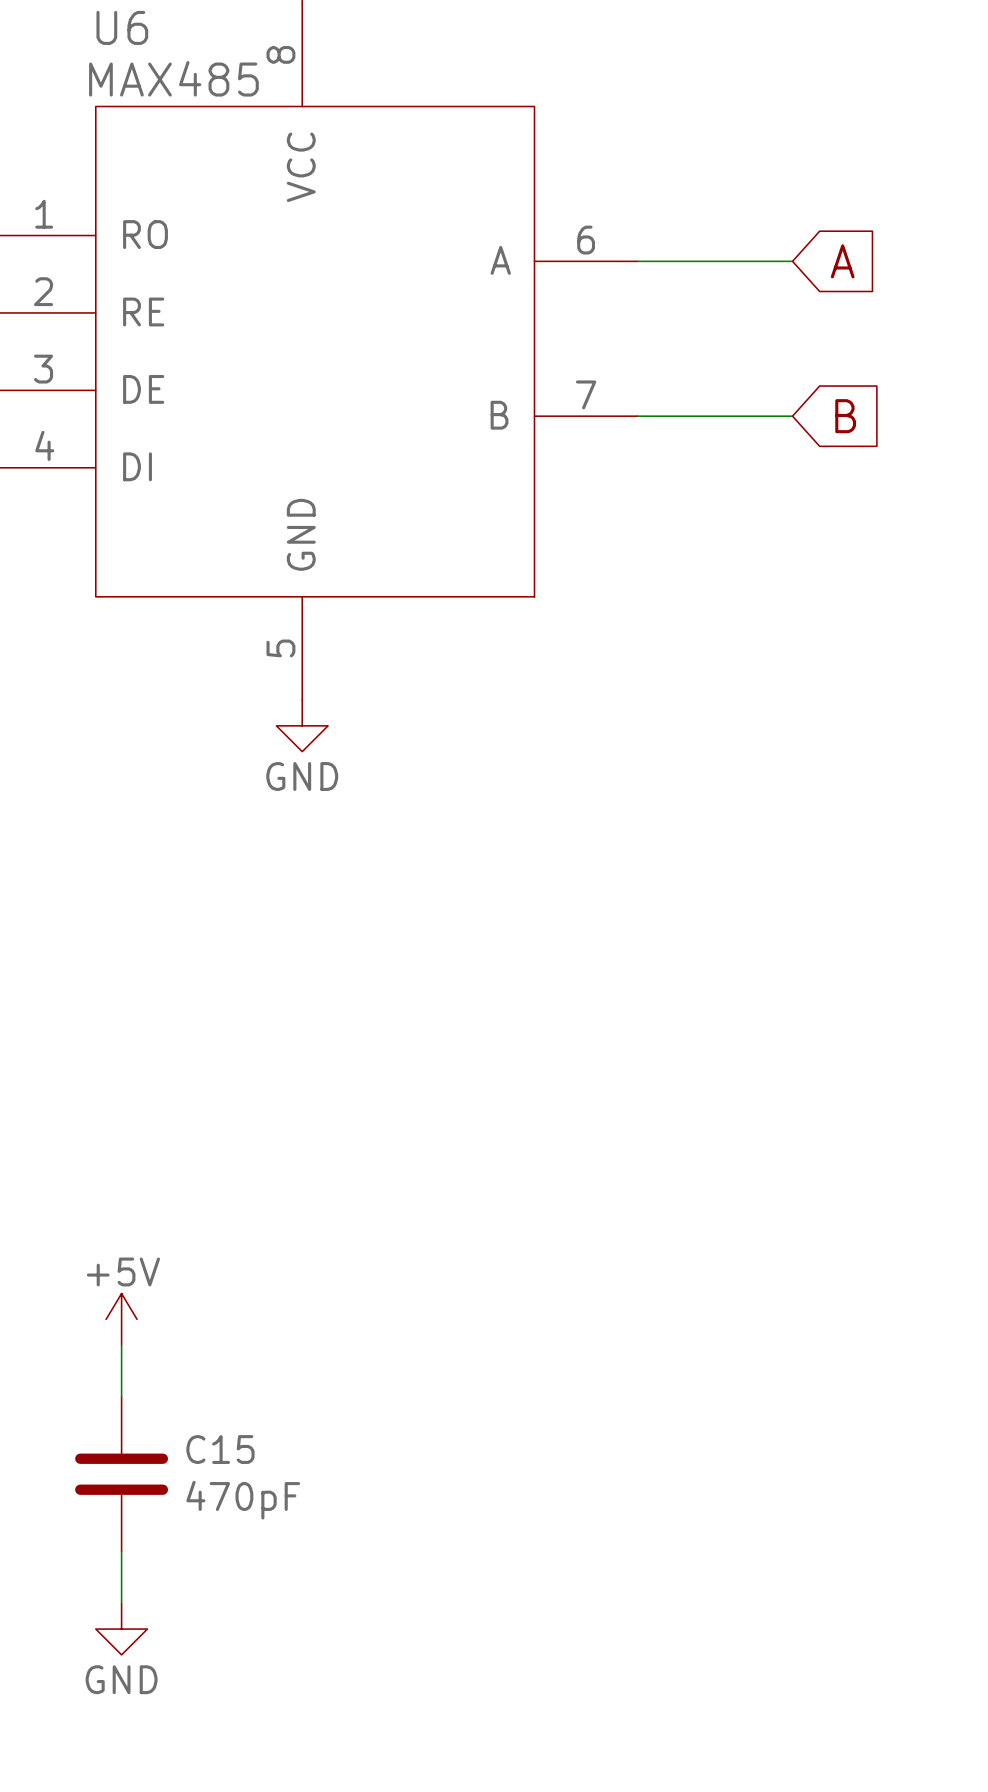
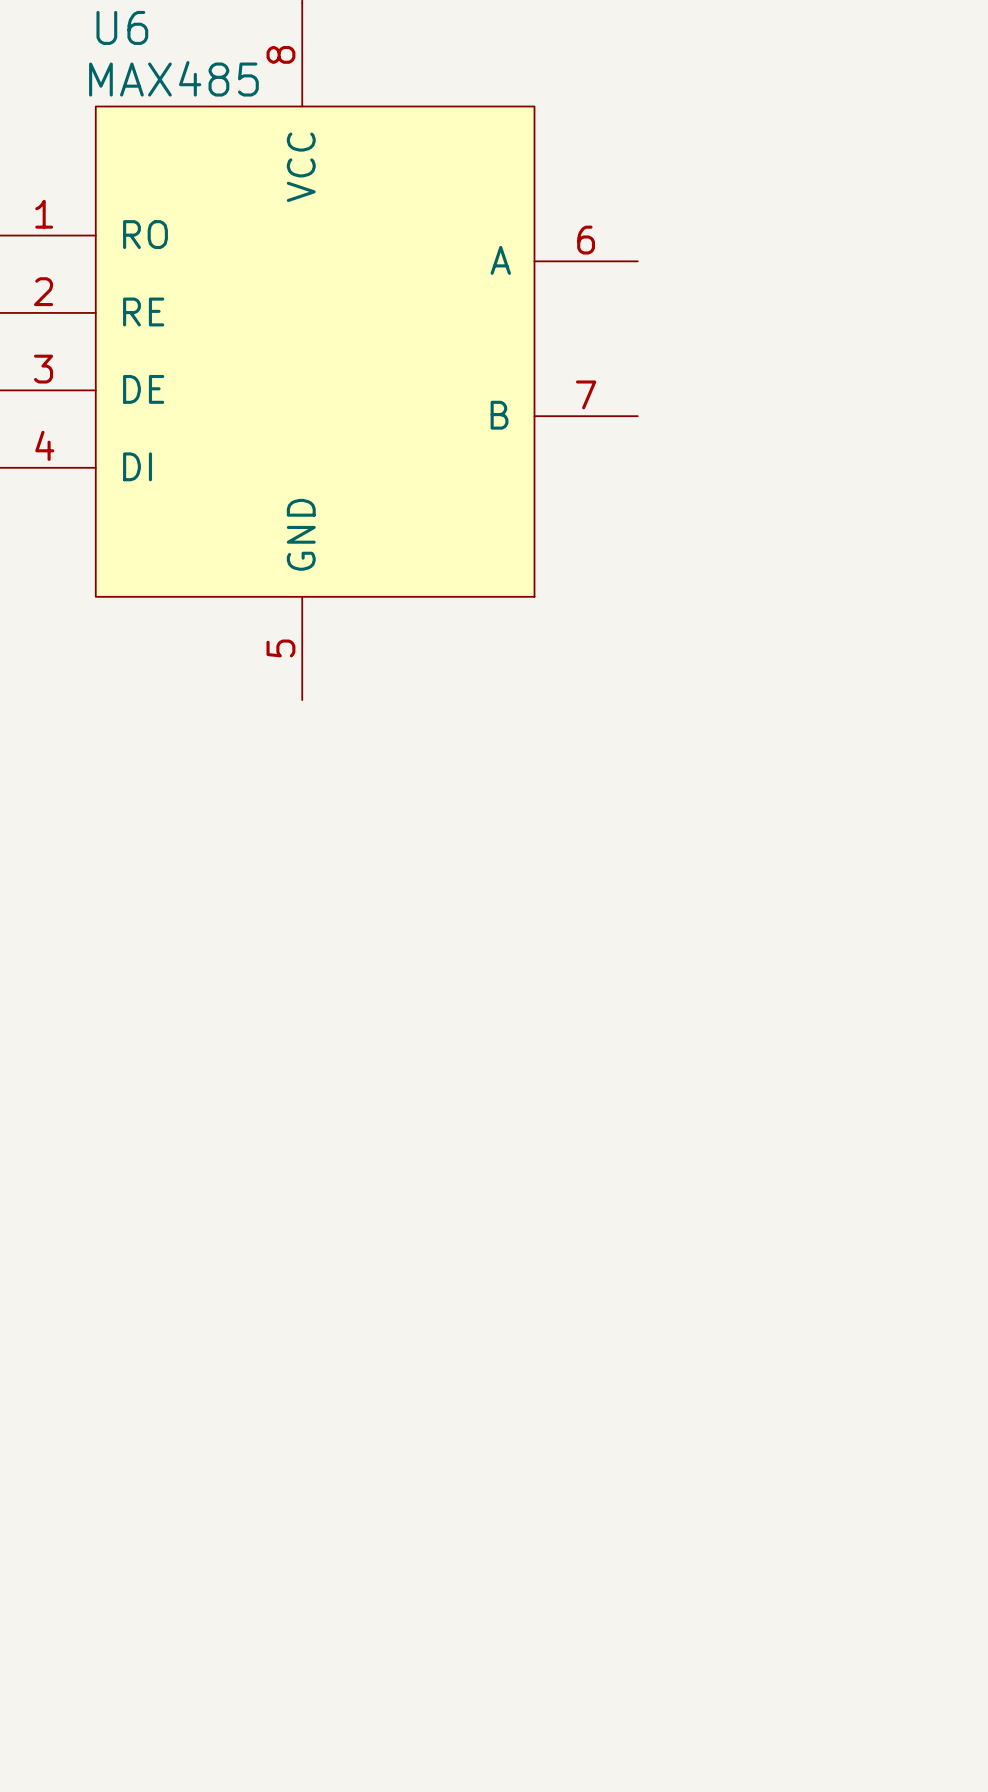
wire: (637, 261) (792, 261) -> none
global label: A (842, 261) -> none
wire: (637, 416) (792, 416) -> none
global label: B (845, 416) -> none
power symbol: GND (302, 725) -> none
power symbol: +5V (121, 1319) -> none
wire: (121, 1345) (121, 1396) -> none
C15: 470pF (121, 1474) -> none
wire: (121, 1551) (121, 1603) -> none
power symbol: GND (121, 1629) -> none

